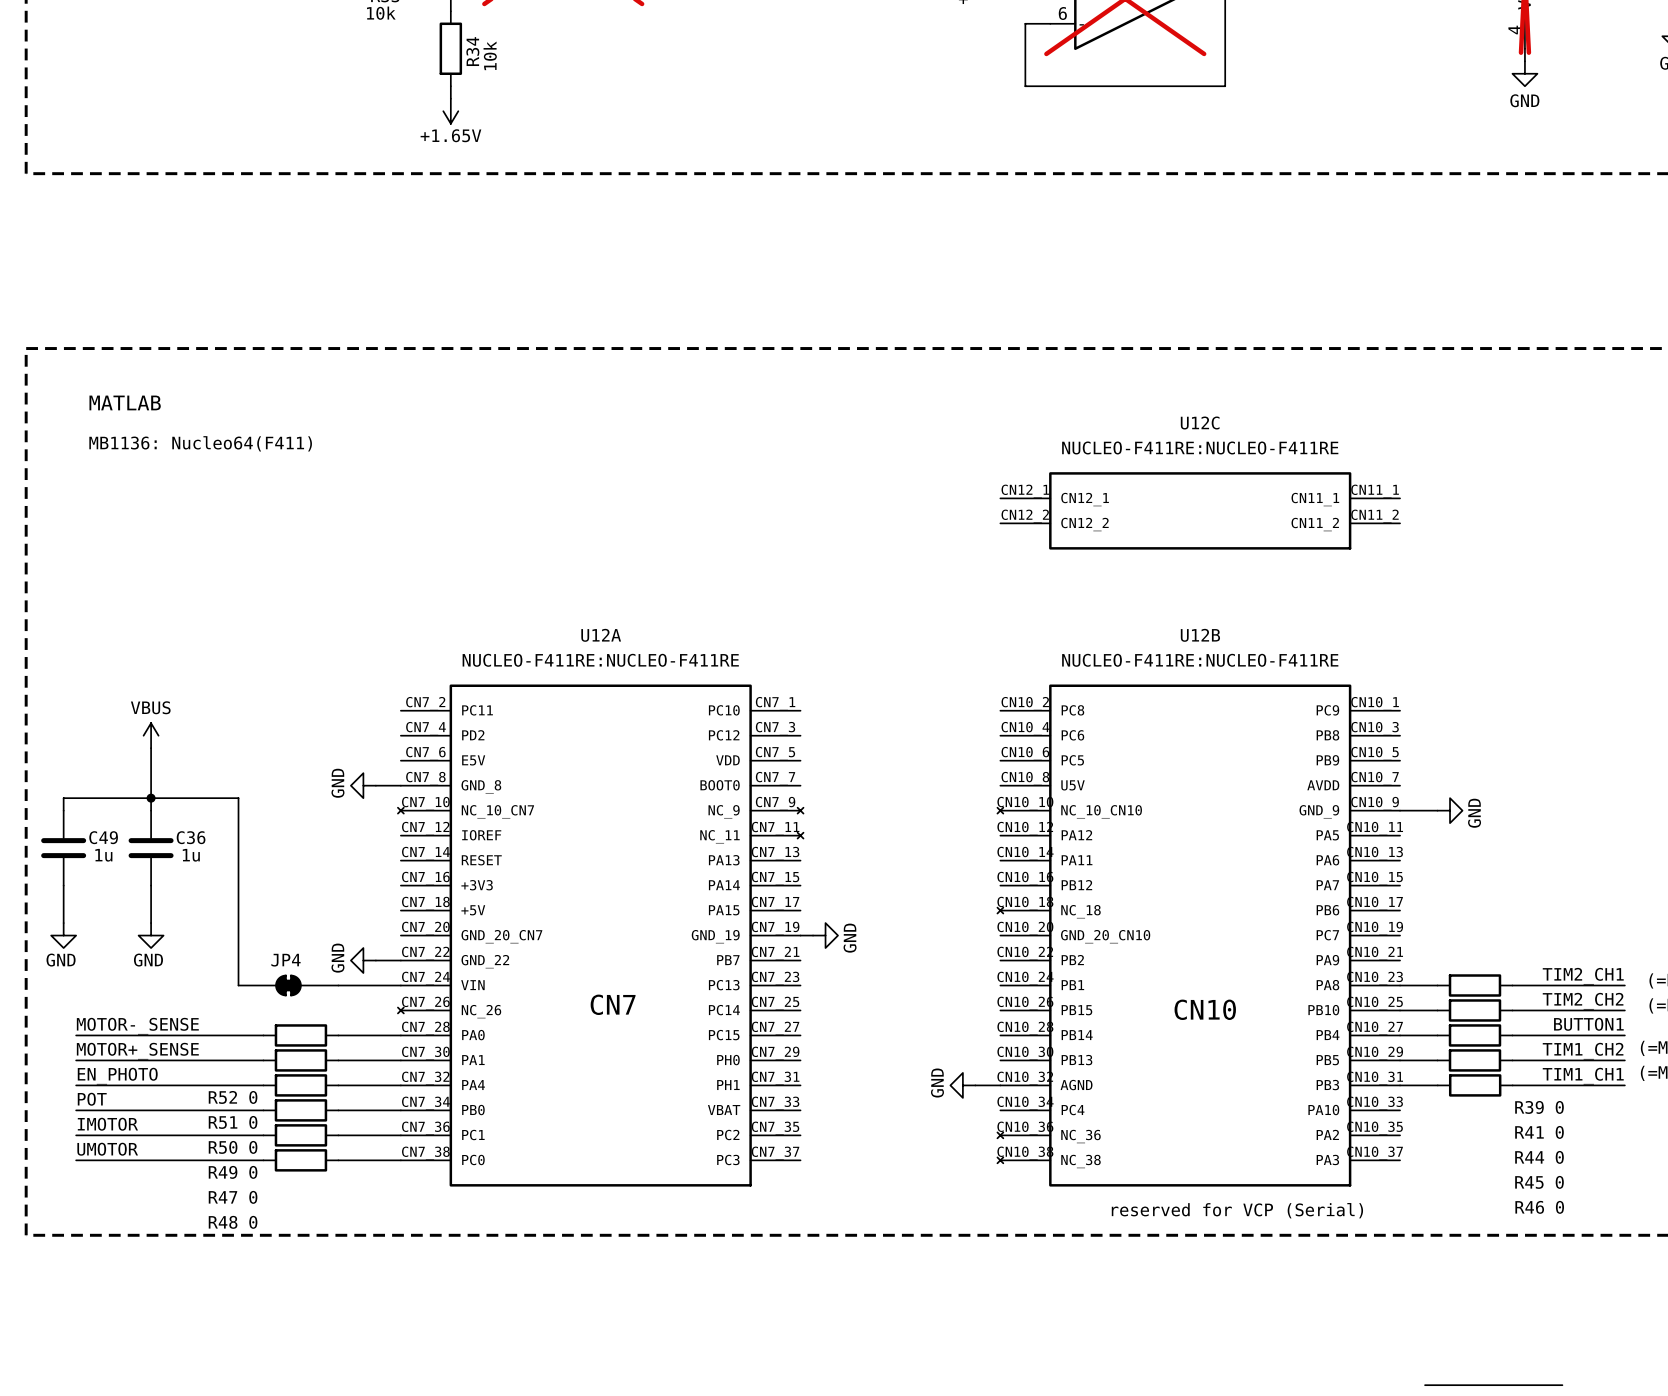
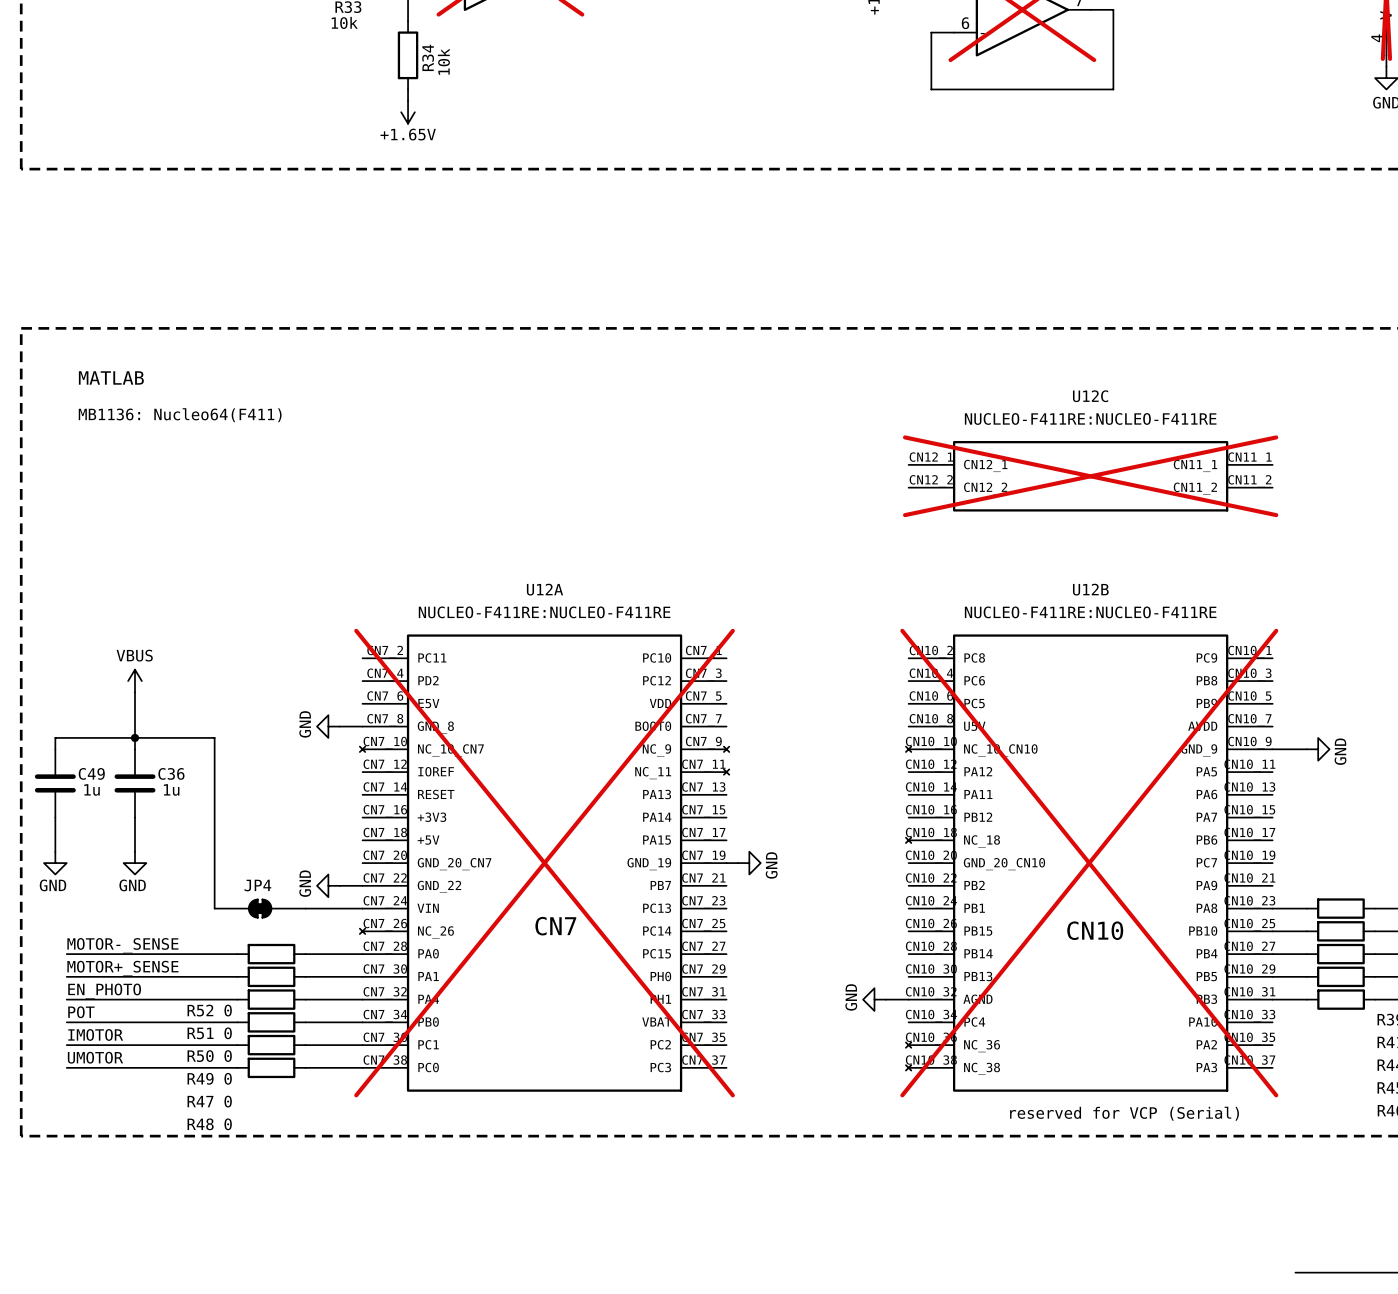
U12C do-not-place cross: none -> (1090, 476)
U12A do-not-place cross: none -> (544, 863)
U12B do-not-place cross: none -> (1089, 863)

